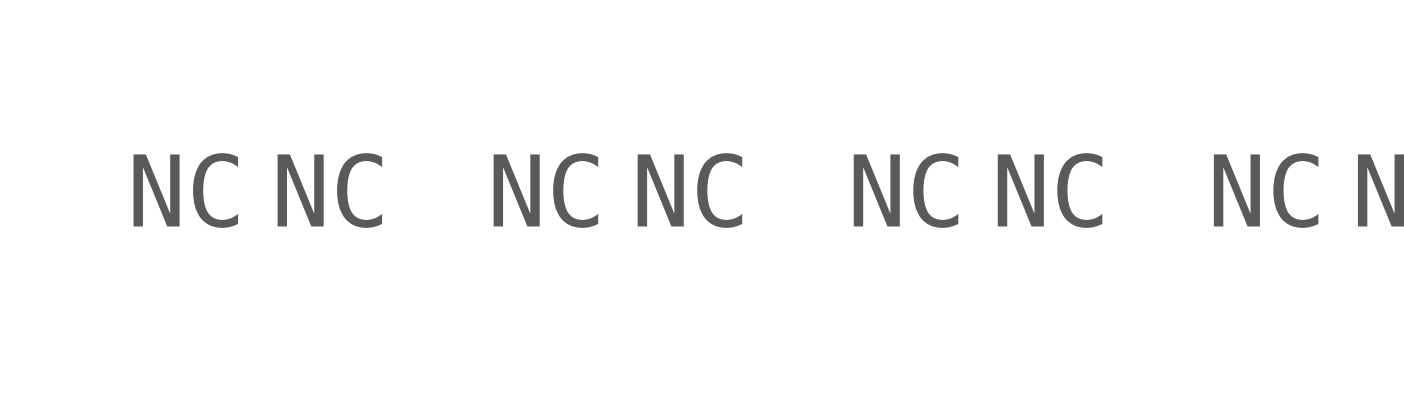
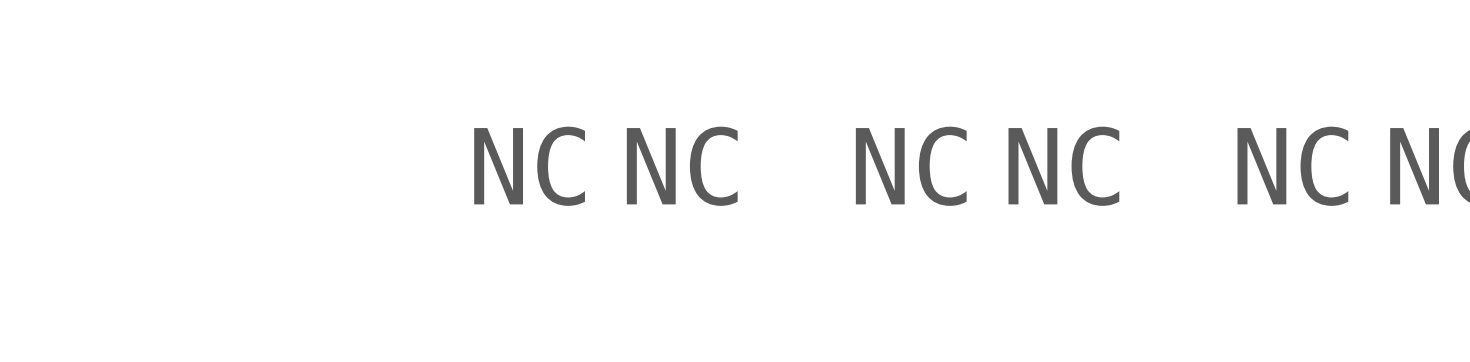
text: NC (185, 190) -> none
text: NC (329, 190) -> none

